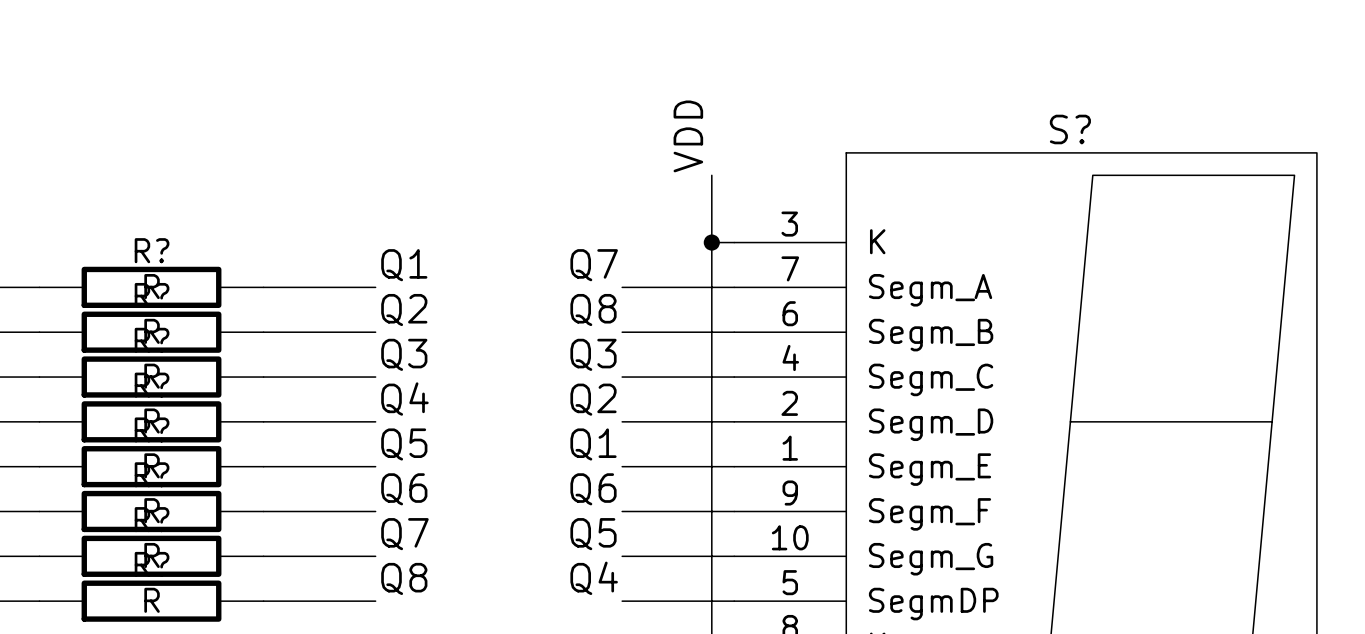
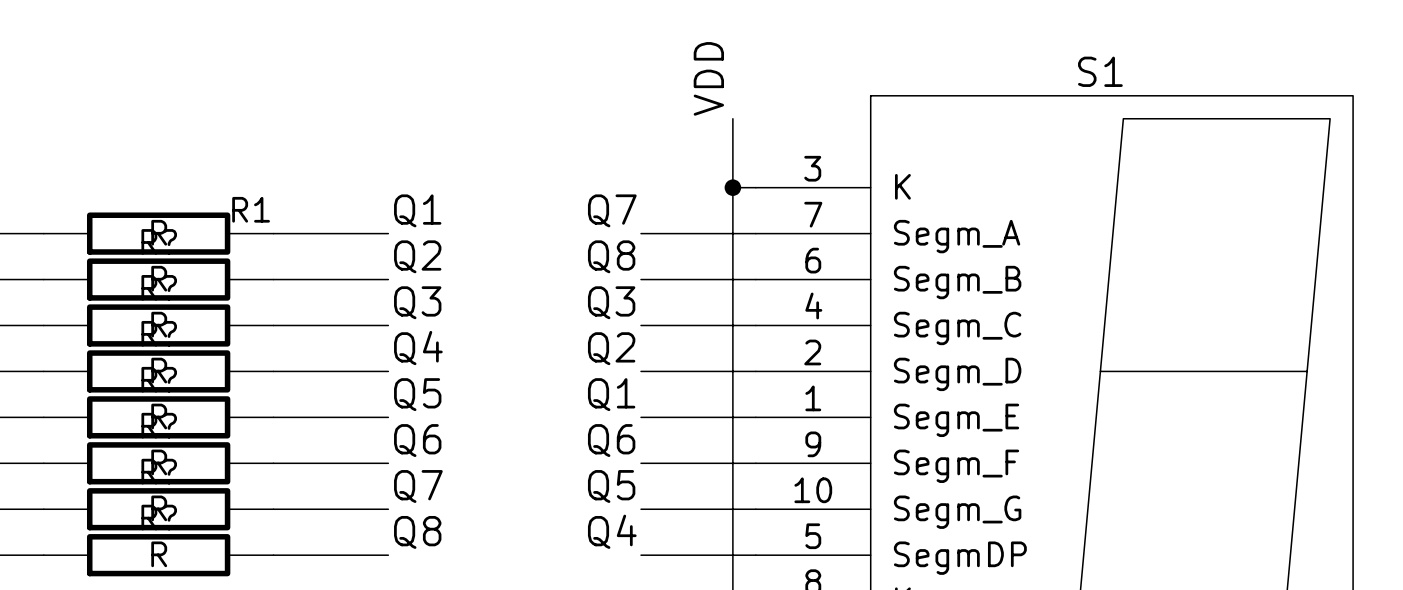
S? name: S? (1070, 129) -> S1 (1100, 71)
R? name: R? (152, 250) -> R1 (251, 209)

